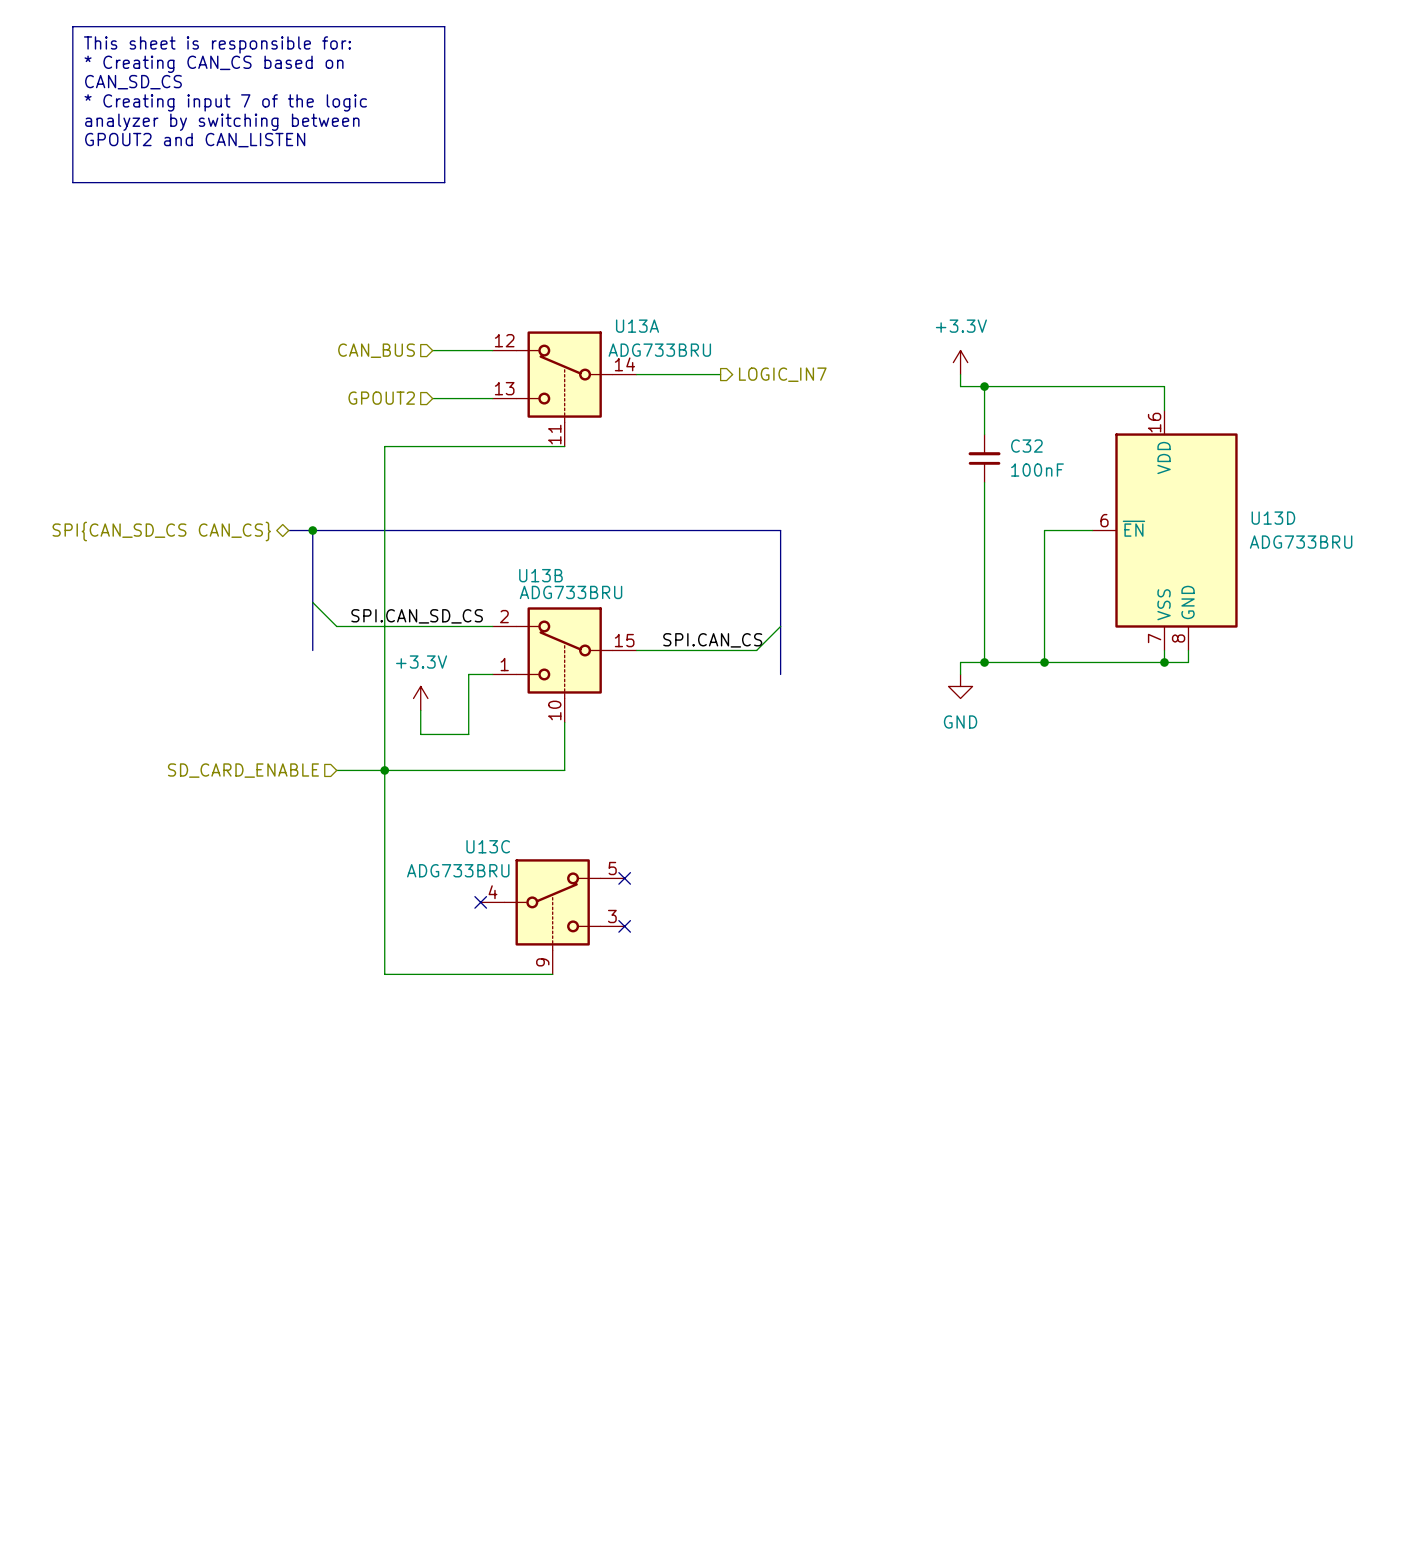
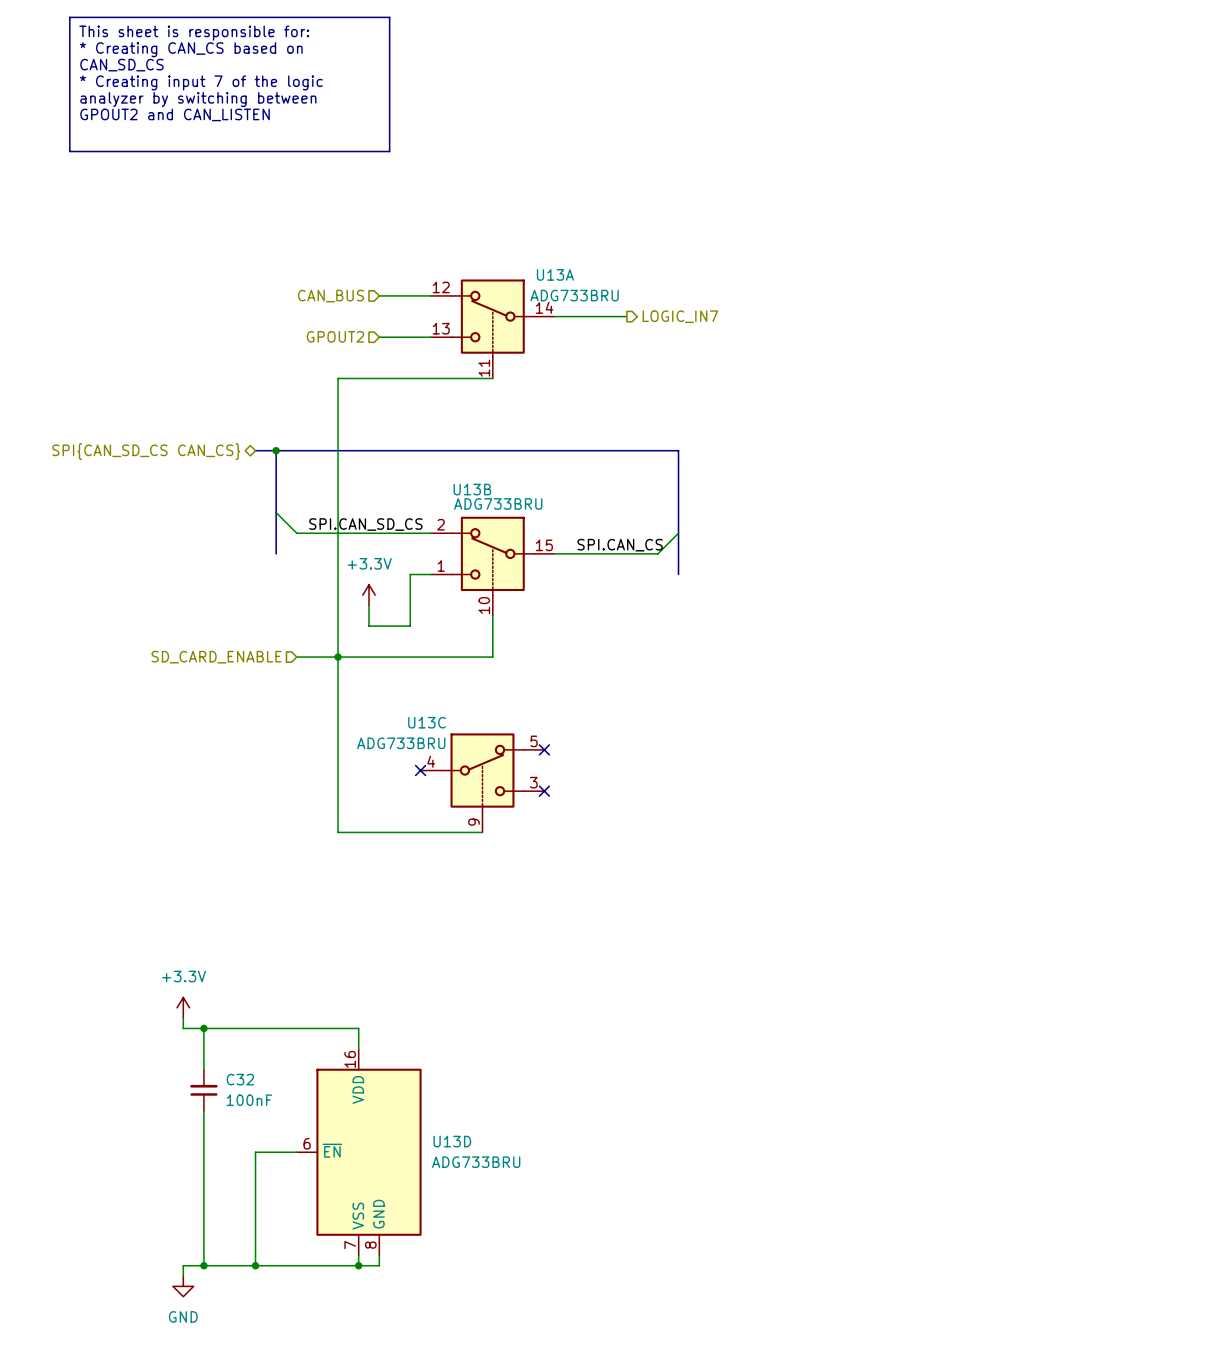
power symbol: +3.3V (960, 362) -> none
wire: (960, 374) (960, 386) (1164, 386) (1164, 410) -> none
wire: (984, 386) (984, 434) -> none
junction: (984, 386) -> none
C32 position: (984, 458) -> (203, 1090)
wire: (984, 482) (984, 662) -> none
wire: (1092, 530) (1044, 530) (1044, 662) -> none
U13D position: (1165, 530) -> (359, 1152)
wire: (1164, 650) (1164, 662) -> none
wire: (1188, 650) (1188, 662) (960, 662) (960, 674) -> none
junction: (984, 662) -> none
junction: (1044, 662) -> none
junction: (1164, 662) -> none
power symbol: GND (960, 686) -> none
power symbol: none -> +3.3V (183, 1007)
wire: none -> (183, 1018) (183, 1028) (358, 1028) (358, 1049)
wire: none -> (203, 1028) (203, 1069)
junction: none -> (203, 1028)
wire: none -> (203, 1110) (203, 1265)
wire: none -> (296, 1152) (255, 1152) (255, 1265)
wire: none -> (358, 1255) (358, 1265)
wire: none -> (379, 1255) (379, 1265) (183, 1265) (183, 1276)
junction: none -> (203, 1265)
junction: none -> (255, 1265)
junction: none -> (358, 1265)
power symbol: none -> GND (183, 1286)

